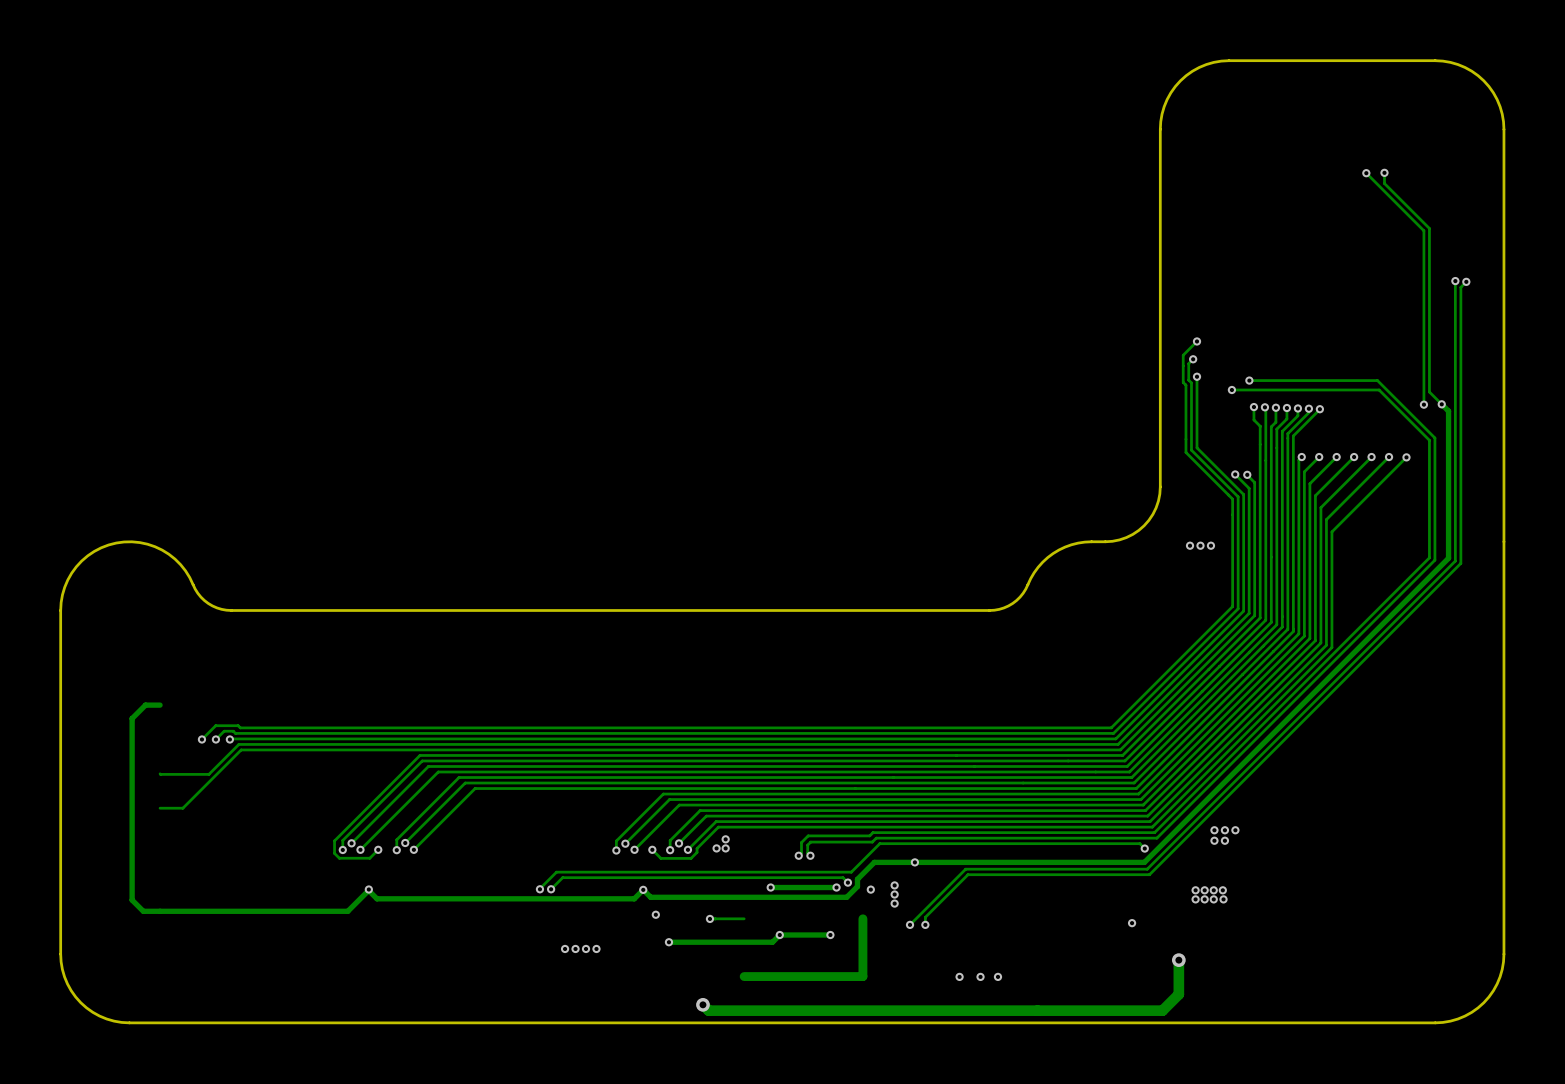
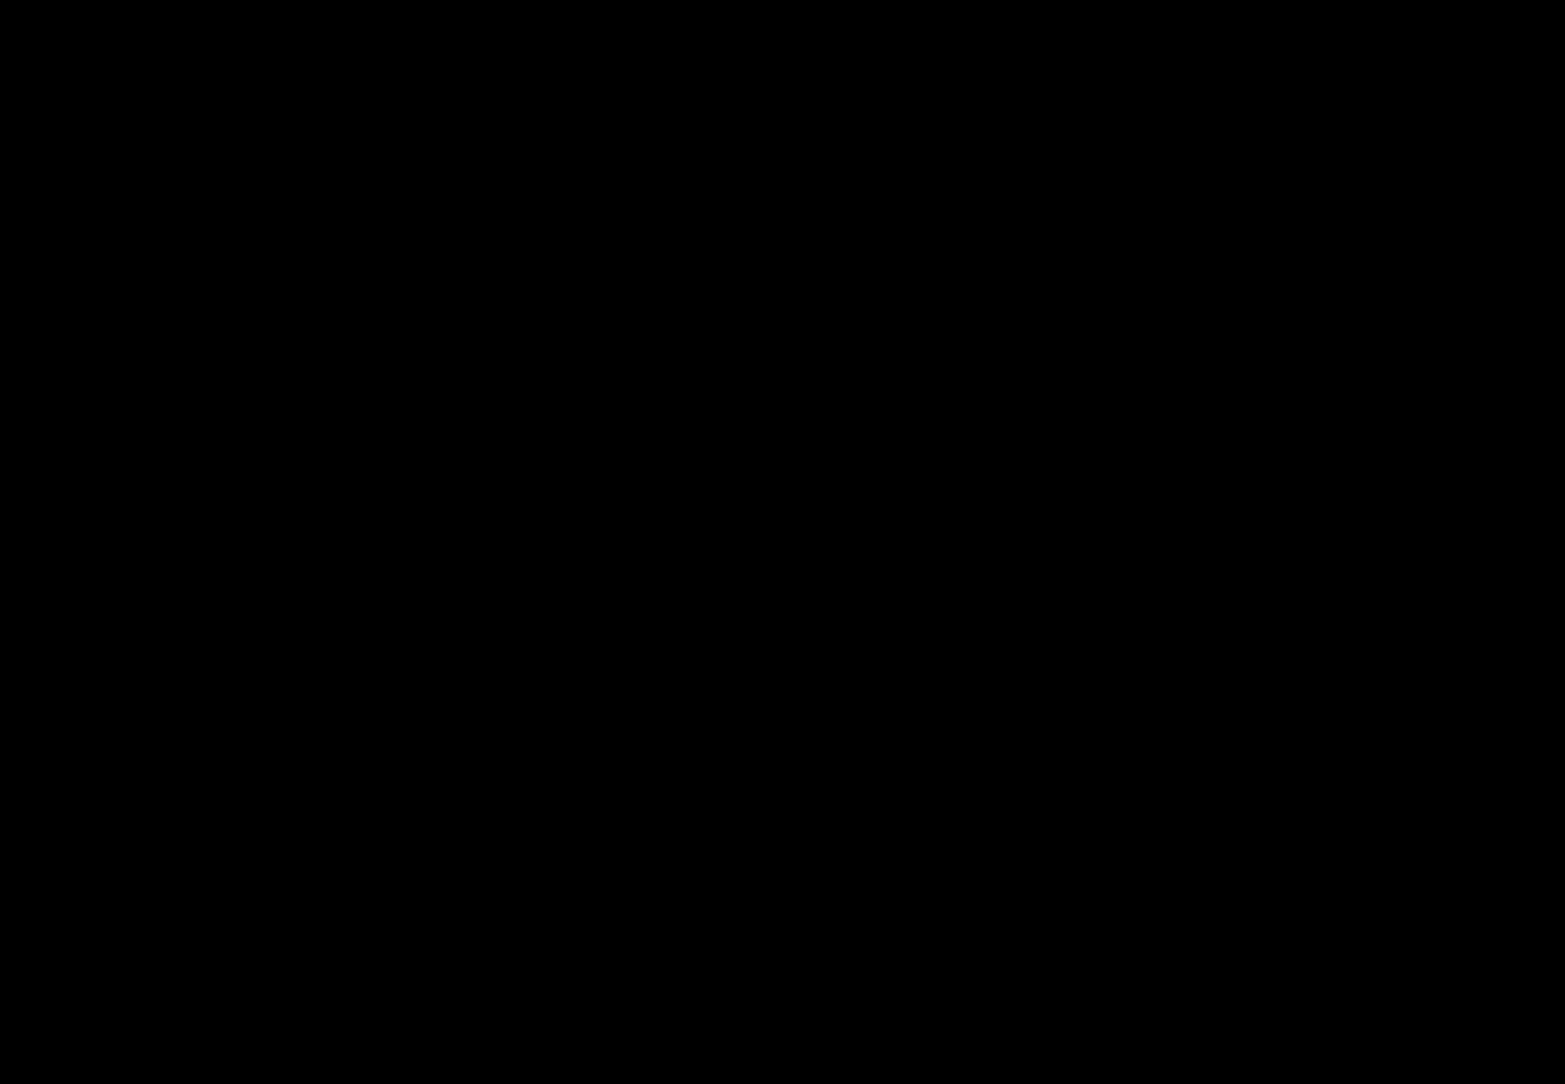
board edge: (1435, 60) (1221, 61) (1199, 67) (1186, 75) (1175, 86) (1164, 106) (1160, 129) (1160, 486) (1158, 501) (1148, 520) (1132, 534) (1112, 541) (1078, 543) (1053, 553) (1038, 567) (1020, 597) (1004, 607) (989, 610) (231, 610) (216, 607) (204, 600) (197, 593) (180, 564) (168, 554) (155, 546) (139, 542) (116, 543) (101, 547) (87, 555) (76, 566) (67, 580) (62, 594) (60, 610) (60, 954) (64, 976) (71, 990) (80, 1002) (92, 1012) (106, 1019) (129, 1022) (1435, 1022) (1450, 1021) (1471, 1012) (1483, 1002) (1493, 990) (1500, 976) (1503, 954) (1503, 129) (1502, 114) (1497, 99) (1483, 80) (1471, 71) (1457, 64) (1435, 60) -> none
track: (1384, 172) (1384, 183) (1429, 228) (1429, 392) (1448, 411) (1448, 558) (1144, 862) (874, 862) (857, 879) (857, 886) (846, 897) (650, 897) (643, 889) (634, 898) (376, 898) (368, 889) -> none
via: (1384, 172) -> none
track: (1366, 173) (1423, 230) (1423, 404) -> none
via: (1366, 173) -> none
track: (1454, 280) (1455, 561) (1147, 869) (965, 869) (910, 924) -> none
via: (1455, 281) -> none
track: (1466, 281) (1460, 287) (1460, 563) (1149, 874) (967, 874) (925, 917) (925, 924) -> none
via: (1466, 281) -> none
track: (1197, 341) (1183, 355) (1183, 382) (1185, 385) (1185, 452) (1232, 499) (1232, 606) (1111, 727) (240, 727) (238, 725) (215, 725) (201, 739) -> none
via: (1197, 341) -> none
track: (1193, 359) (1188, 363) (1188, 380) (1191, 382) (1191, 450) (1238, 496) (1238, 608) (1113, 733) (235, 733) (233, 731) (224, 731) (215, 739) -> none
via: (1193, 359) -> none
track: (1197, 376) (1197, 447) (1243, 494) (1243, 611) (1115, 738) (229, 739) -> none
via: (1197, 376) -> none
track: (1249, 380) (1377, 380) (1434, 438) (1434, 560) (1156, 838) (876, 838) (872, 842) (810, 842) (807, 845) (807, 853) (810, 855) -> none
via: (1249, 380) -> none
track: (1231, 390) (1379, 390) (1429, 440) (1429, 557) (1154, 832) (873, 832) (869, 835) (808, 835) (801, 842) (801, 853) (798, 855) -> none
via: (1231, 390) -> none
via: (1423, 404) -> none
via: (1441, 404) -> none
track: (1253, 407) (1253, 419) (1260, 426) -> none
via: (1253, 407) -> none
track: (1264, 407) (1265, 620) (1124, 760) (422, 760) (342, 840) (342, 849) -> none
via: (1264, 407) -> none
track: (1275, 407) (1275, 422) (1271, 426) (1271, 622) (1127, 766) (428, 766) (351, 843) -> none
via: (1275, 407) -> none
track: (1286, 408) (1286, 419) (1276, 429) (1276, 624) (1129, 772) (438, 772) (360, 849) -> none
via: (1286, 408) -> none
track: (1297, 408) (1297, 415) (1282, 431) (1282, 626) (1131, 777) (459, 777) (396, 839) (396, 850) -> none
via: (1297, 408) -> none
track: (1308, 408) (1308, 412) (1287, 433) (1287, 629) (1134, 783) (465, 783) (405, 843) -> none
via: (1308, 408) -> none
track: (1319, 409) (1293, 435) (1293, 631) (1136, 788) (475, 788) (413, 849) -> none
via: (1319, 409) -> none
track: (1260, 426) (1260, 617) (1122, 755) (419, 755) (334, 840) (334, 853) (339, 858) (369, 858) (378, 849) -> none
track: (1301, 457) (1298, 459) (1298, 633) (1138, 794) (663, 794) (616, 841) (616, 850) -> none
via: (1301, 457) -> none
track: (1319, 457) (1304, 471) (1304, 636) (1140, 799) (669, 799) (625, 843) -> none
via: (1319, 457) -> none
track: (1336, 457) (1309, 483) (1309, 638) (1143, 805) (679, 805) (634, 849) -> none
via: (1336, 457) -> none
track: (1354, 457) (1315, 495) (1315, 640) (1145, 810) (700, 810) (670, 840) (670, 850) -> none
via: (1354, 457) -> none
track: (1371, 457) (1320, 507) (1320, 642) (1147, 816) (706, 816) (679, 843) -> none
via: (1371, 457) -> none
track: (1389, 457) (1326, 519) (1326, 645) (1150, 821) (716, 821) (687, 849) -> none
via: (1389, 457) -> none
track: (1406, 457) (1331, 531) (1331, 647) (1152, 827) (718, 827) (697, 848) (697, 852) (691, 858) (660, 858) (652, 849) -> none
via: (1406, 457) -> none
track: (1235, 474) (1249, 488) (1249, 613) (1118, 744) (238, 744) (208, 774) (160, 773) -> none
via: (1235, 474) -> none
track: (1247, 474) (1254, 482) (1254, 615) (1120, 749) (241, 749) (182, 808) (160, 808) -> none
via: (1247, 474) -> none
via: (1190, 545) -> none
via: (1200, 545) -> none
via: (1210, 545) -> none
track: (160, 705) (145, 705) (132, 718) (132, 900) (143, 911) (347, 911) (368, 890) -> none
via: (201, 739) -> none
via: (215, 739) -> none
via: (229, 739) -> none
via: (1214, 830) -> none
via: (1224, 830) -> none
via: (1235, 830) -> none
via: (725, 839) -> none
via: (1214, 840) -> none
via: (1224, 840) -> none
via: (351, 843) -> none
via: (405, 843) -> none
via: (625, 843) -> none
via: (679, 843) -> none
via: (716, 848) -> none
via: (725, 848) -> none
track: (1144, 848) (1139, 843) (879, 843) (851, 872) (556, 872) (539, 889) -> none
via: (1144, 848) -> none
via: (342, 849) -> none
via: (360, 849) -> none
via: (378, 849) -> none
via: (413, 849) -> none
via: (634, 849) -> none
via: (652, 849) -> none
via: (687, 849) -> none
via: (396, 850) -> none
via: (616, 850) -> none
via: (670, 850) -> none
via: (798, 855) -> none
via: (810, 855) -> none
via: (914, 862) -> none
track: (847, 882) (842, 877) (562, 877) (551, 889) -> none
via: (847, 882) -> none
via: (894, 885) -> none
via: (770, 887) -> none
track: (836, 887) (770, 887) -> none
via: (836, 887) -> none
via: (368, 889) -> none
via: (539, 889) -> none
via: (551, 889) -> none
via: (643, 889) -> none
via: (870, 889) -> none
via: (1195, 890) -> none
via: (1204, 890) -> none
via: (1213, 890) -> none
via: (1222, 890) -> none
via: (894, 894) -> none
via: (1195, 899) -> none
via: (1204, 899) -> none
via: (1213, 899) -> none
via: (1223, 899) -> none
via: (894, 903) -> none
via: (655, 914) -> none
via: (709, 918) -> none
track: (744, 918) (715, 918) -> none
track: (862, 918) (862, 976) (744, 976) -> none
via: (1132, 923) -> none
via: (910, 924) -> none
via: (925, 924) -> none
via: (779, 935) -> none
track: (830, 935) (779, 935) (772, 942) (668, 942) -> none
via: (830, 935) -> none
via: (668, 942) -> none
via: (565, 948) -> none
via: (575, 948) -> none
via: (586, 948) -> none
via: (596, 948) -> none
track: (1178, 960) (1178, 994) (1162, 1010) (708, 1010) (702, 1004) -> none
via: (1178, 960) -> none
via: (959, 976) -> none
via: (980, 976) -> none
via: (997, 976) -> none
via: (702, 1004) -> none

